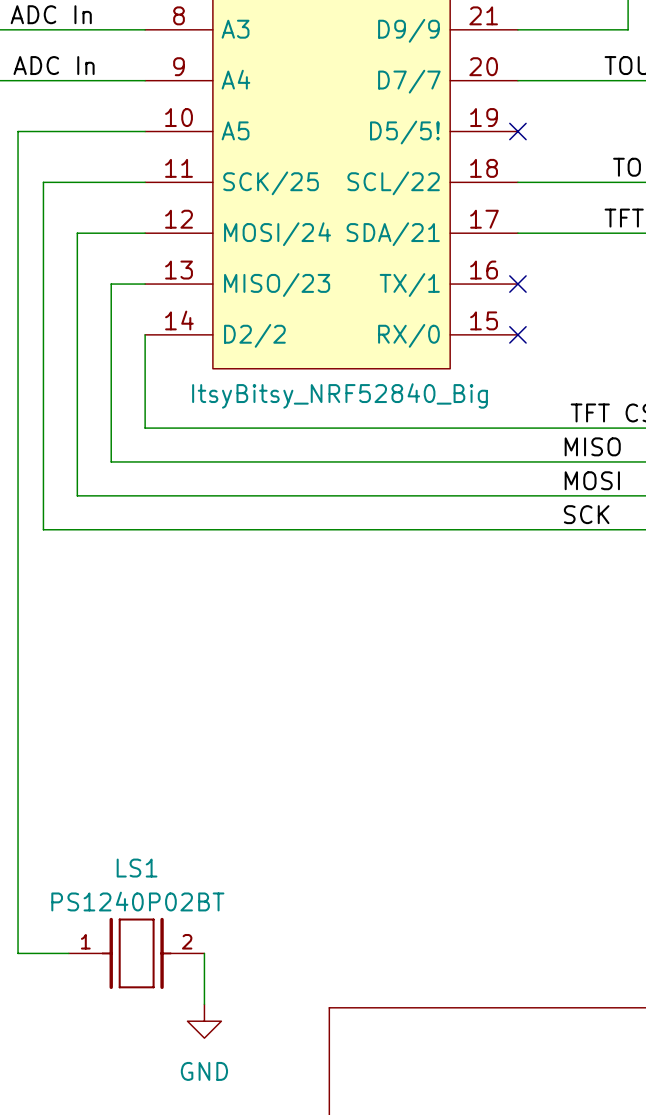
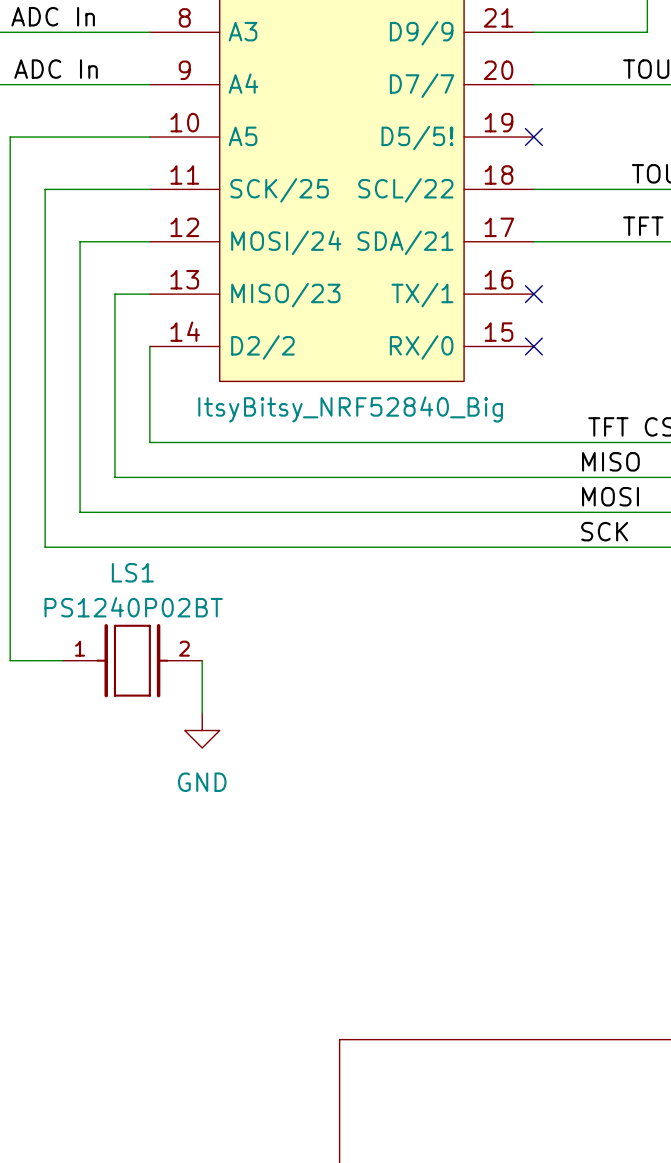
wire: (18, 131) (18, 953) (68, 953) -> (18, 137) (10, 137) (10, 660) (62, 660)
LS1 position: (136, 953) -> (132, 660)
wire: (204, 953) (204, 1004) -> (202, 660) (202, 713)
power symbol position: GND (204, 1021) -> GND (202, 730)

